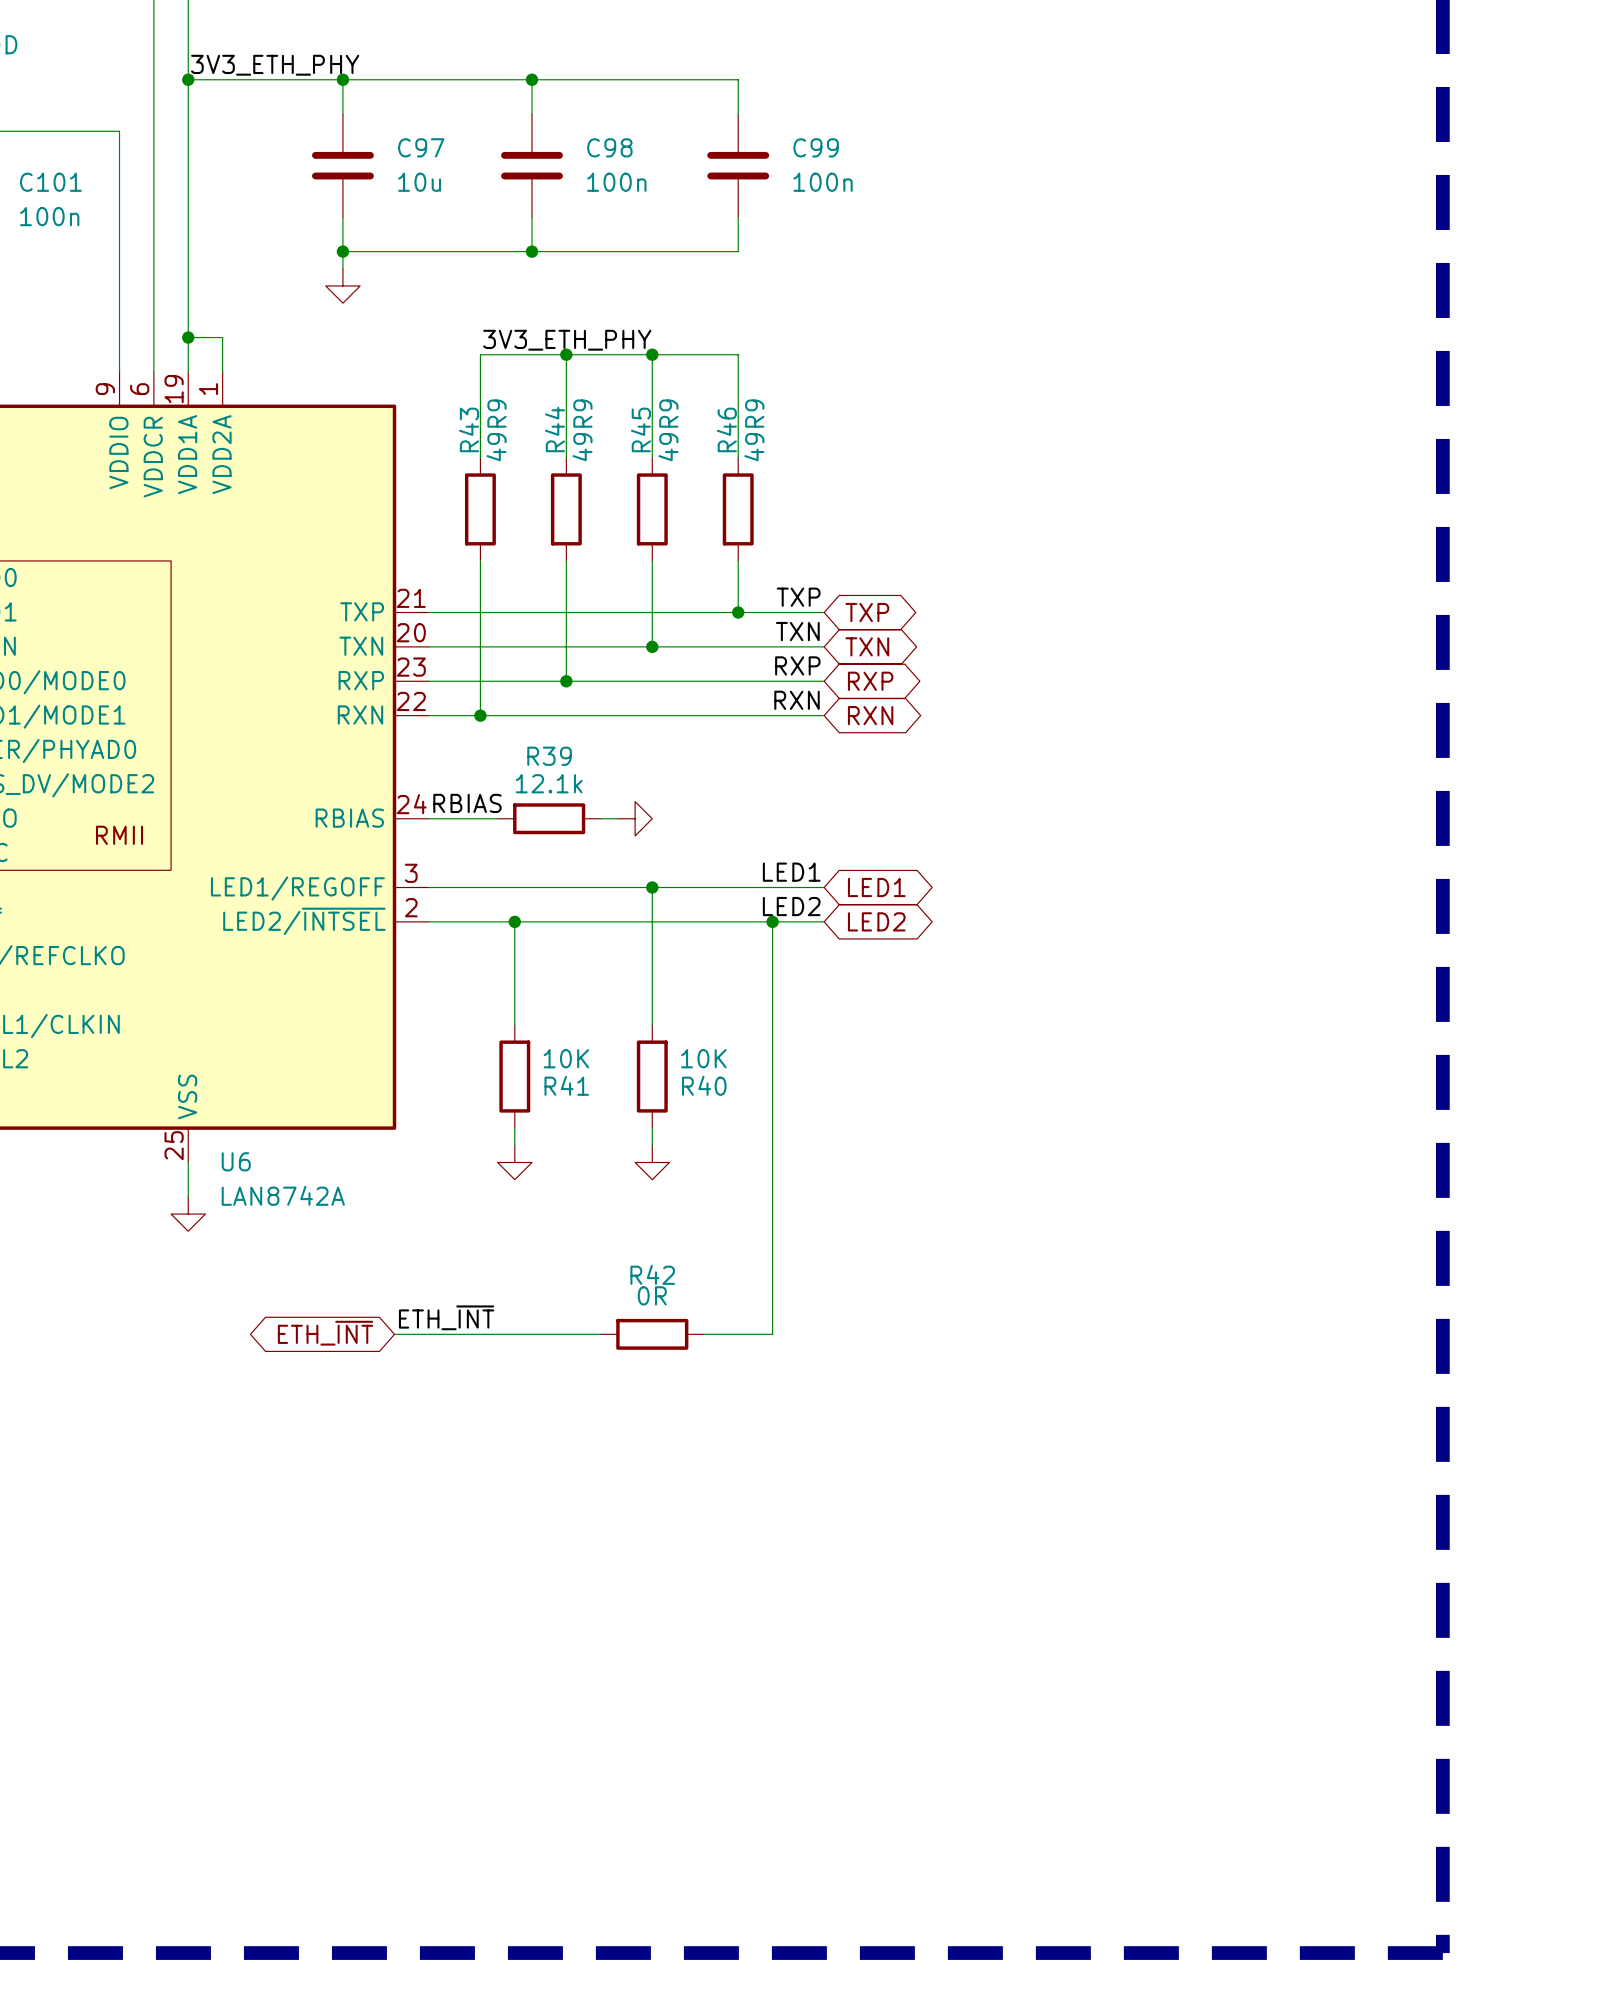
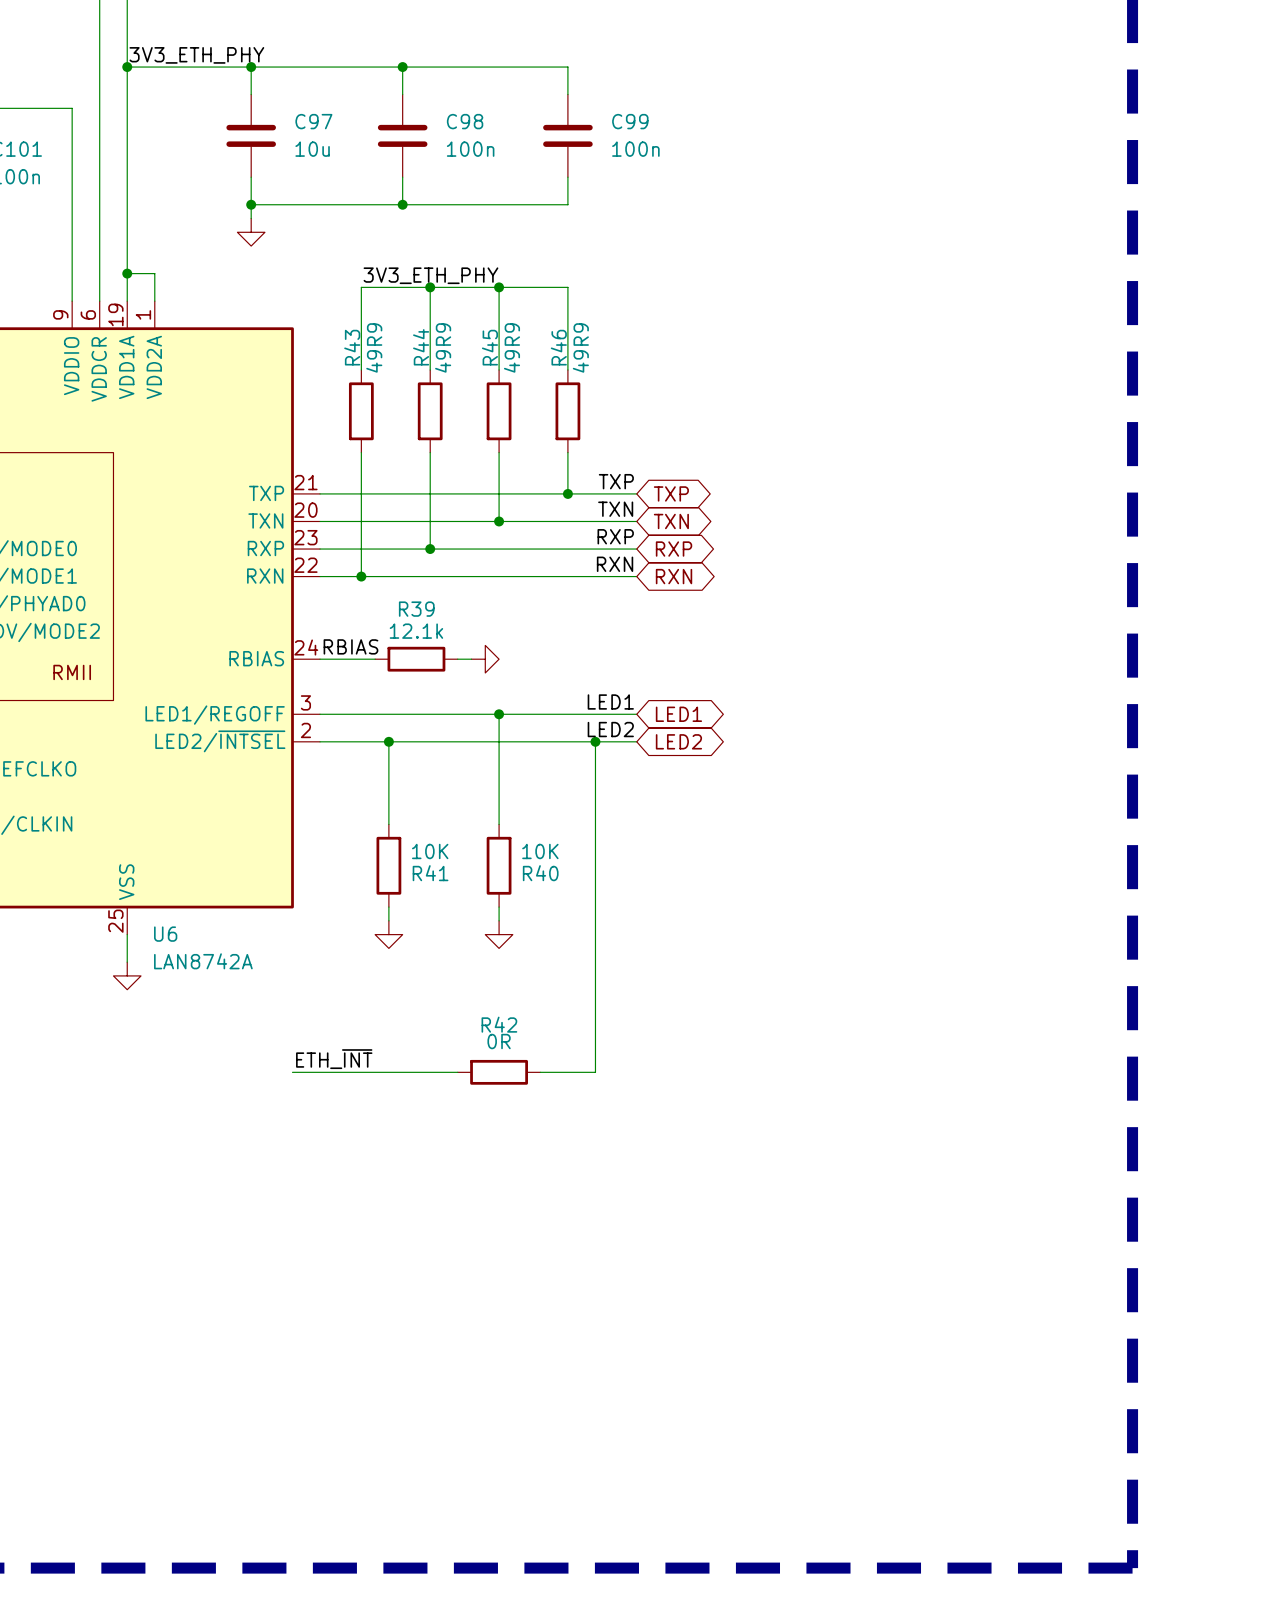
global label: ETH_~{INT} (325, 1333) -> none

